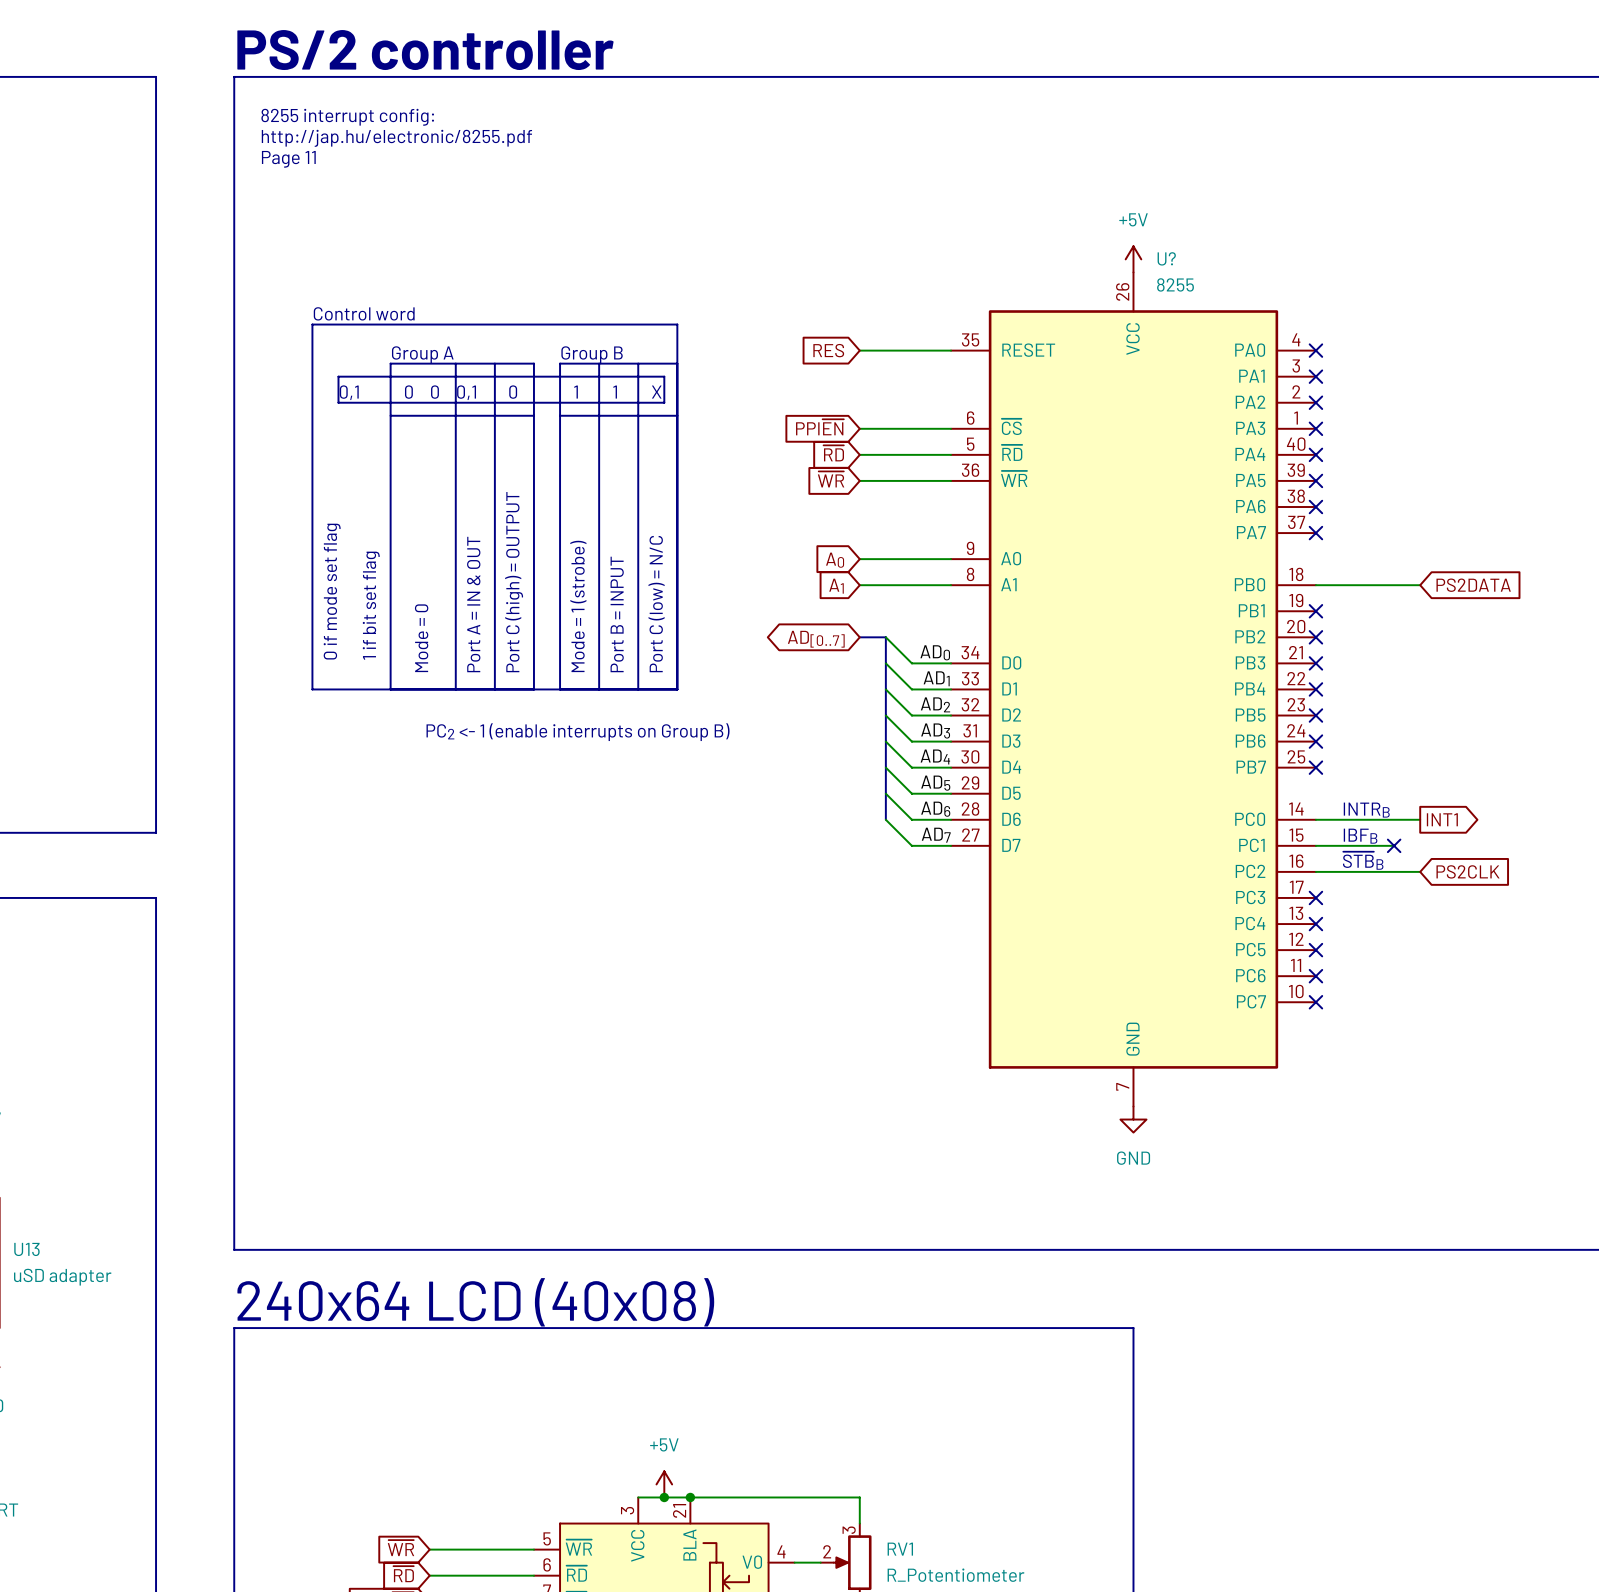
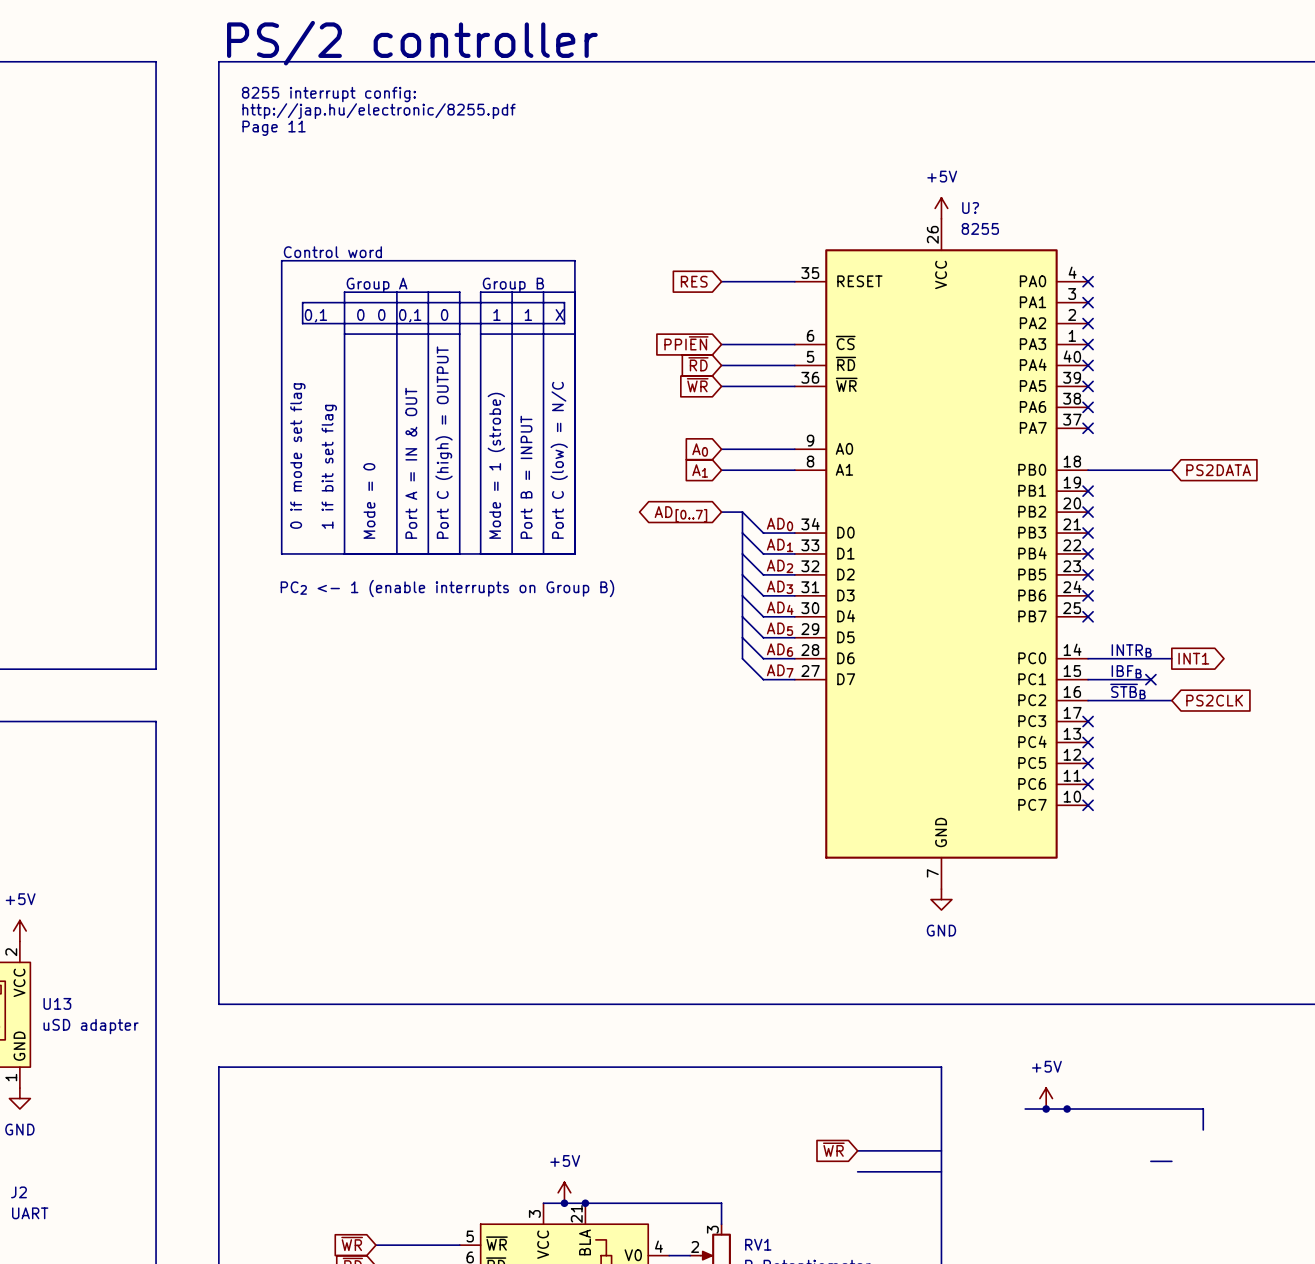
text: 240x64 LCD (40x08) (475, 1302) -> none
power symbol: none -> +5V (1046, 1098)
wire: none -> (1025, 1109) (1203, 1109) (1203, 1129)
junction: none -> (1046, 1109)
junction: none -> (1067, 1109)
global label: none -> ~{WR} (833, 1149)
wire: none -> (857, 1150) (941, 1150)
wire: none -> (1150, 1161) (1171, 1161)
wire: none -> (857, 1171) (941, 1171)

